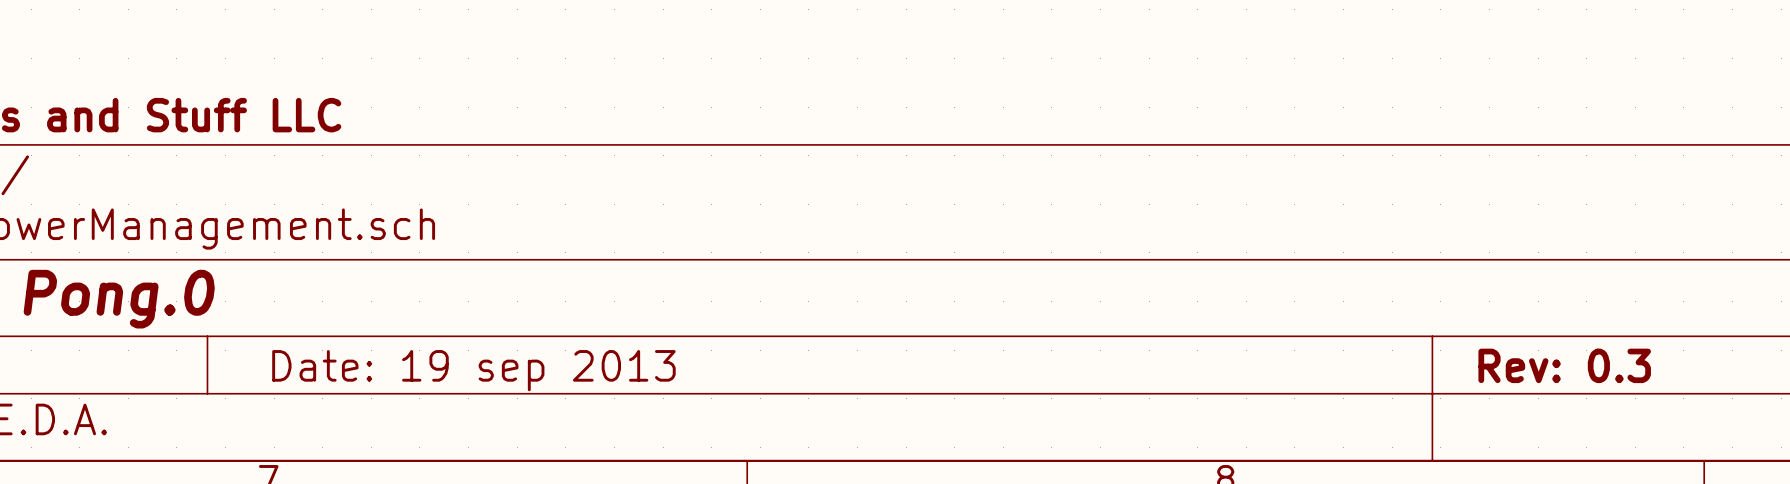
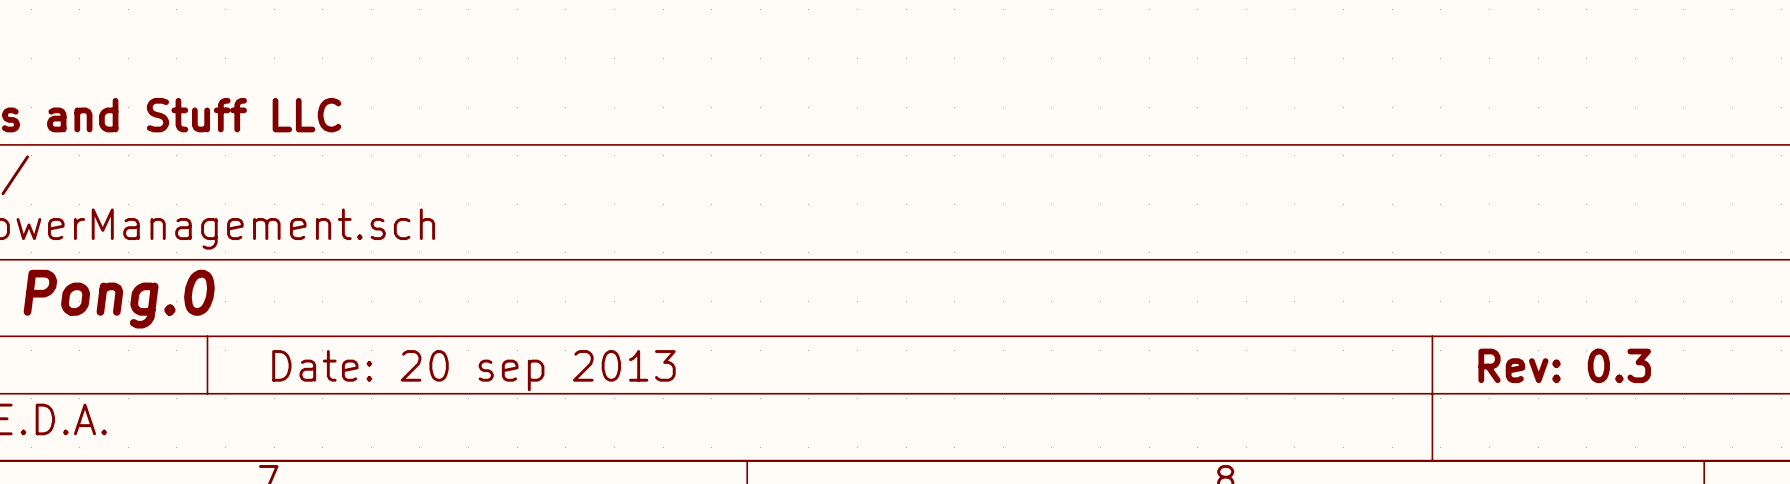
title block: Date: 19 sep 2013 (473, 370) -> Date: 20 sep 2013 (473, 370)

